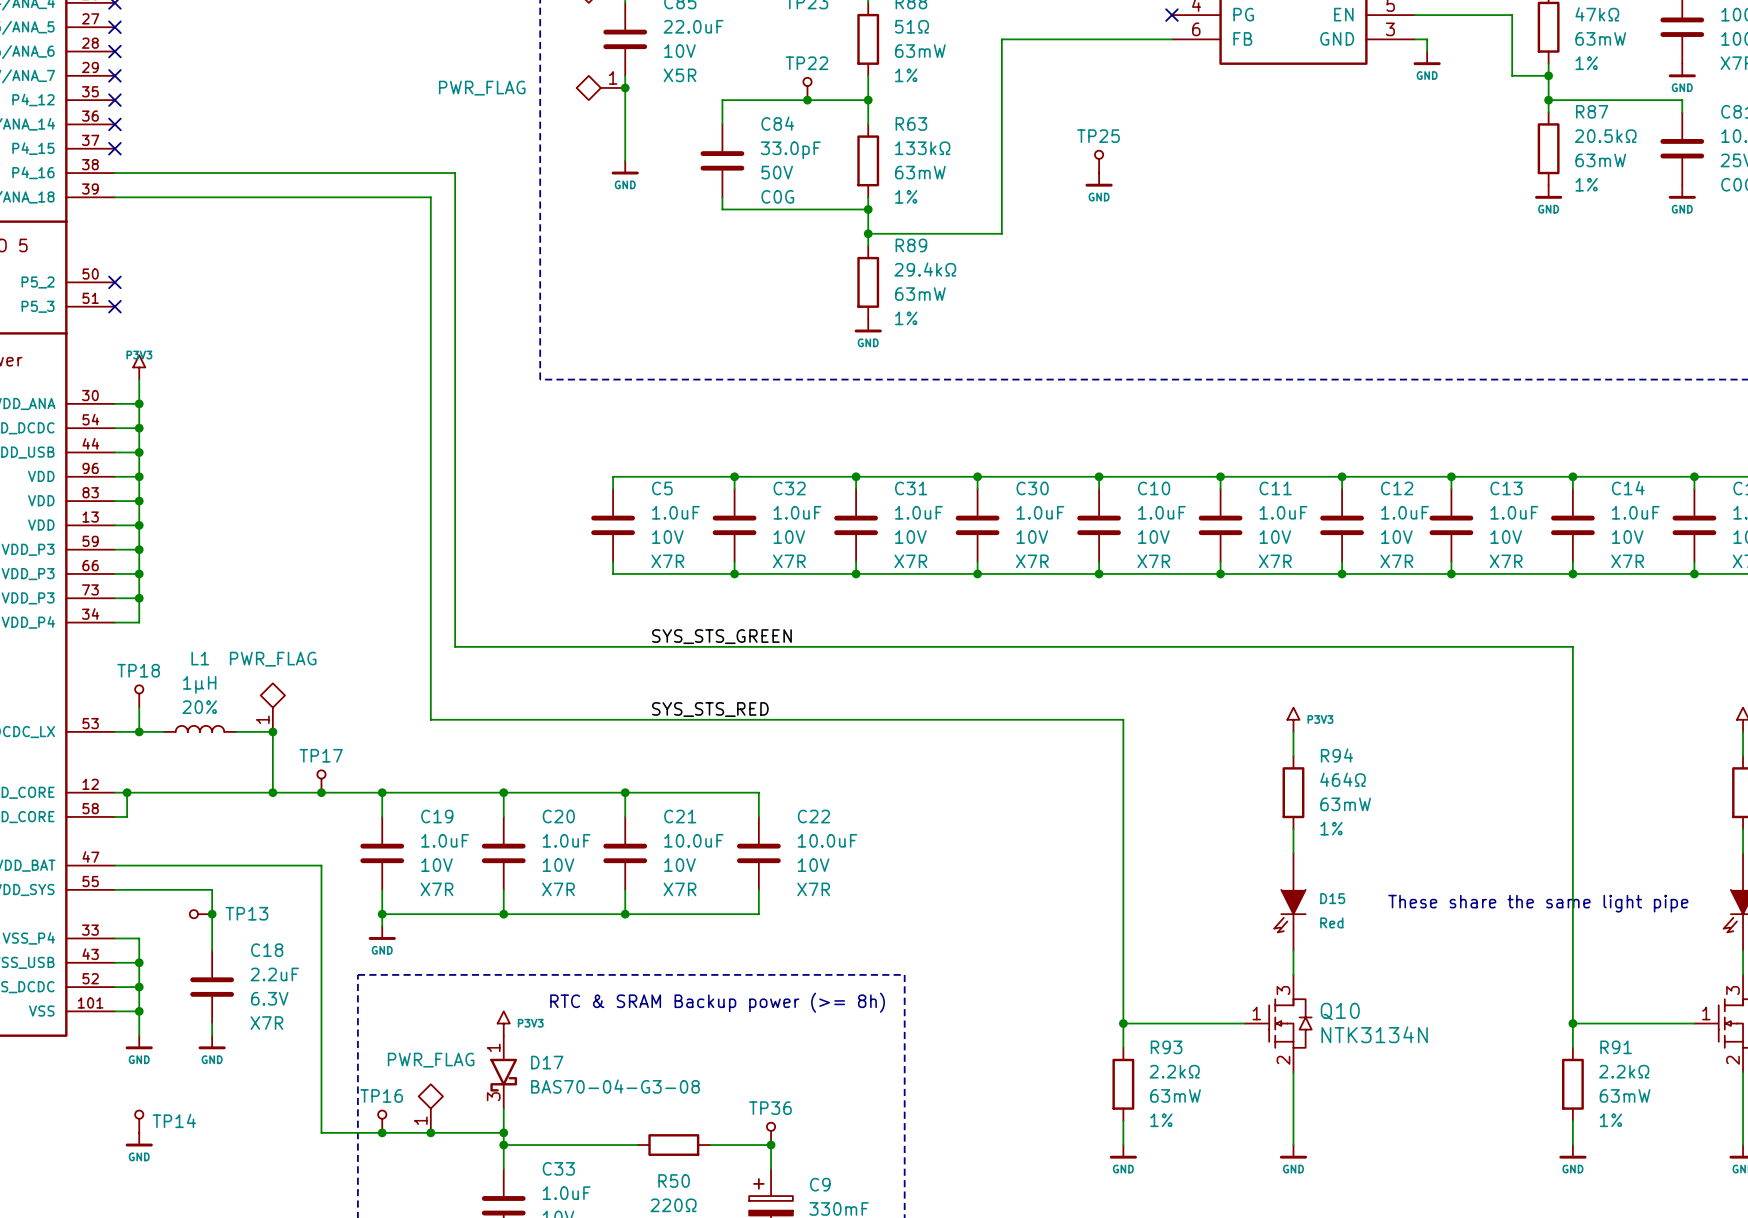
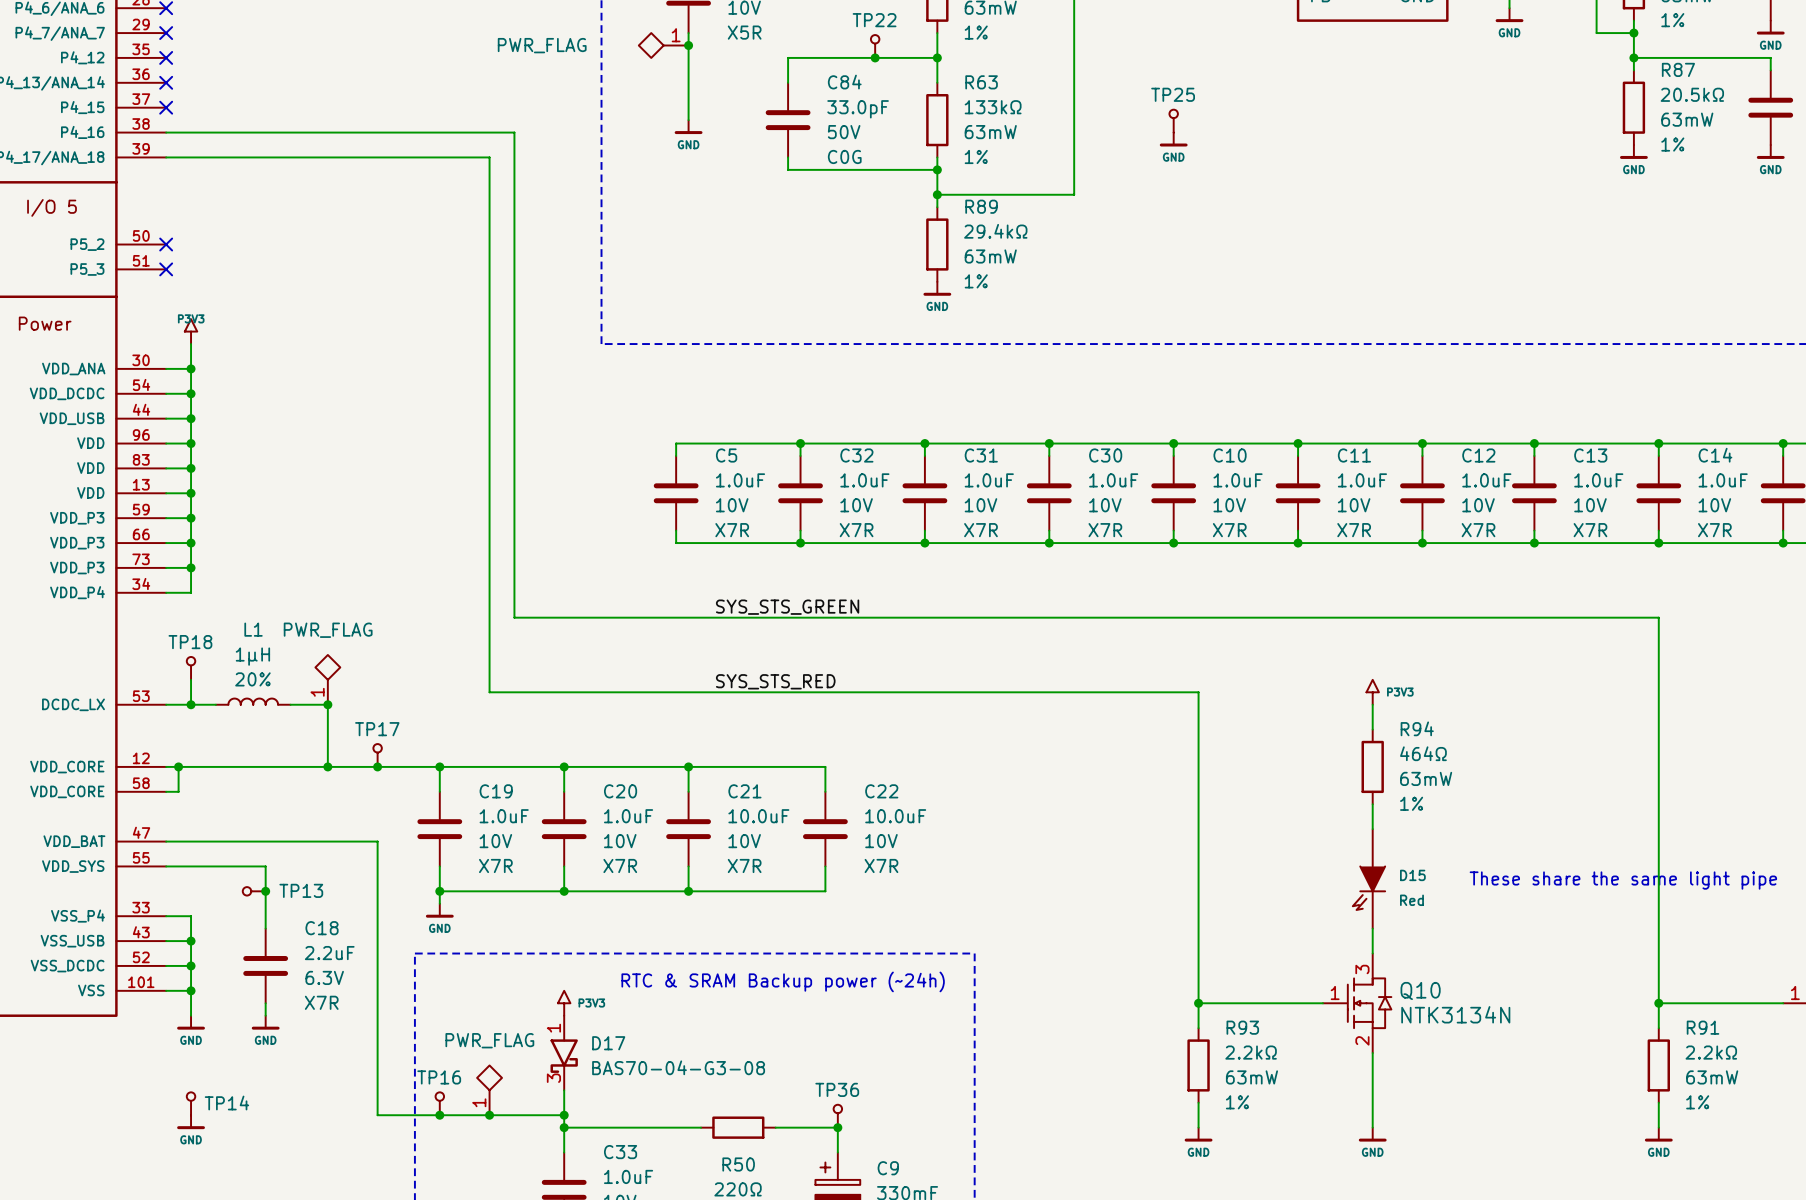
text: RTC & SRAM Backup power (>= 8h) (717, 1002) -> RTC & SRAM Backup power (~24h) (783, 981)

